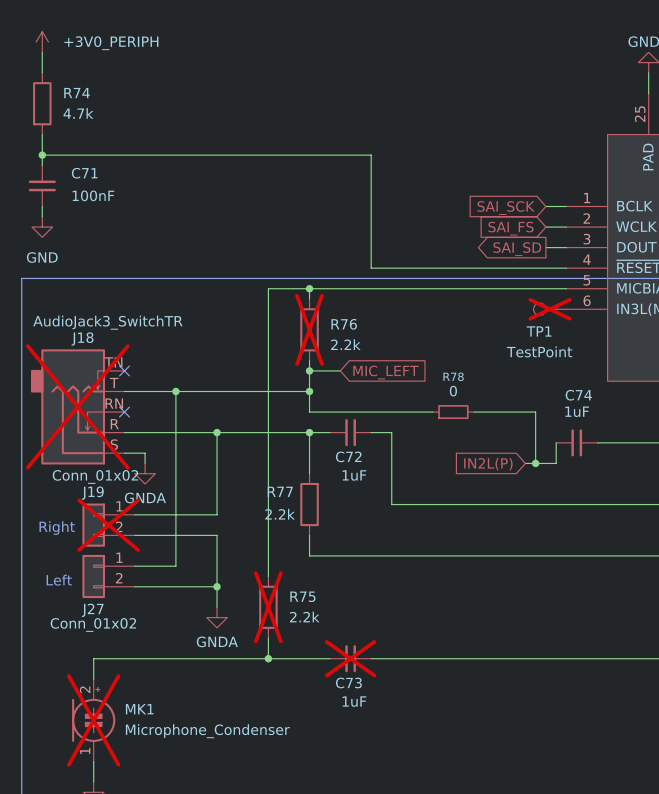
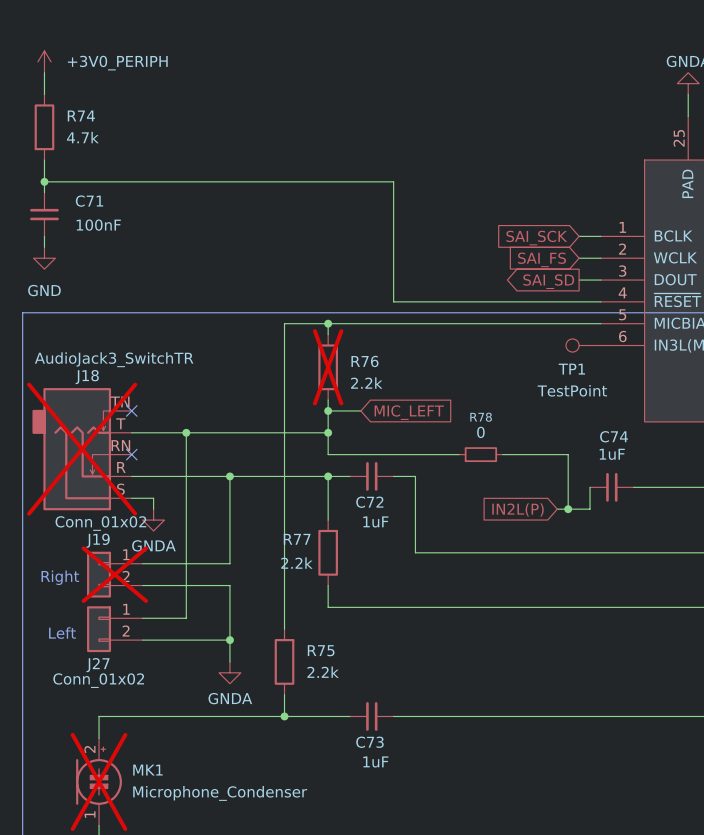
TP1 do-not-place cross: (550, 309) -> none
R75 do-not-place cross: (268, 607) -> none
C73 do-not-place cross: (350, 658) -> none

